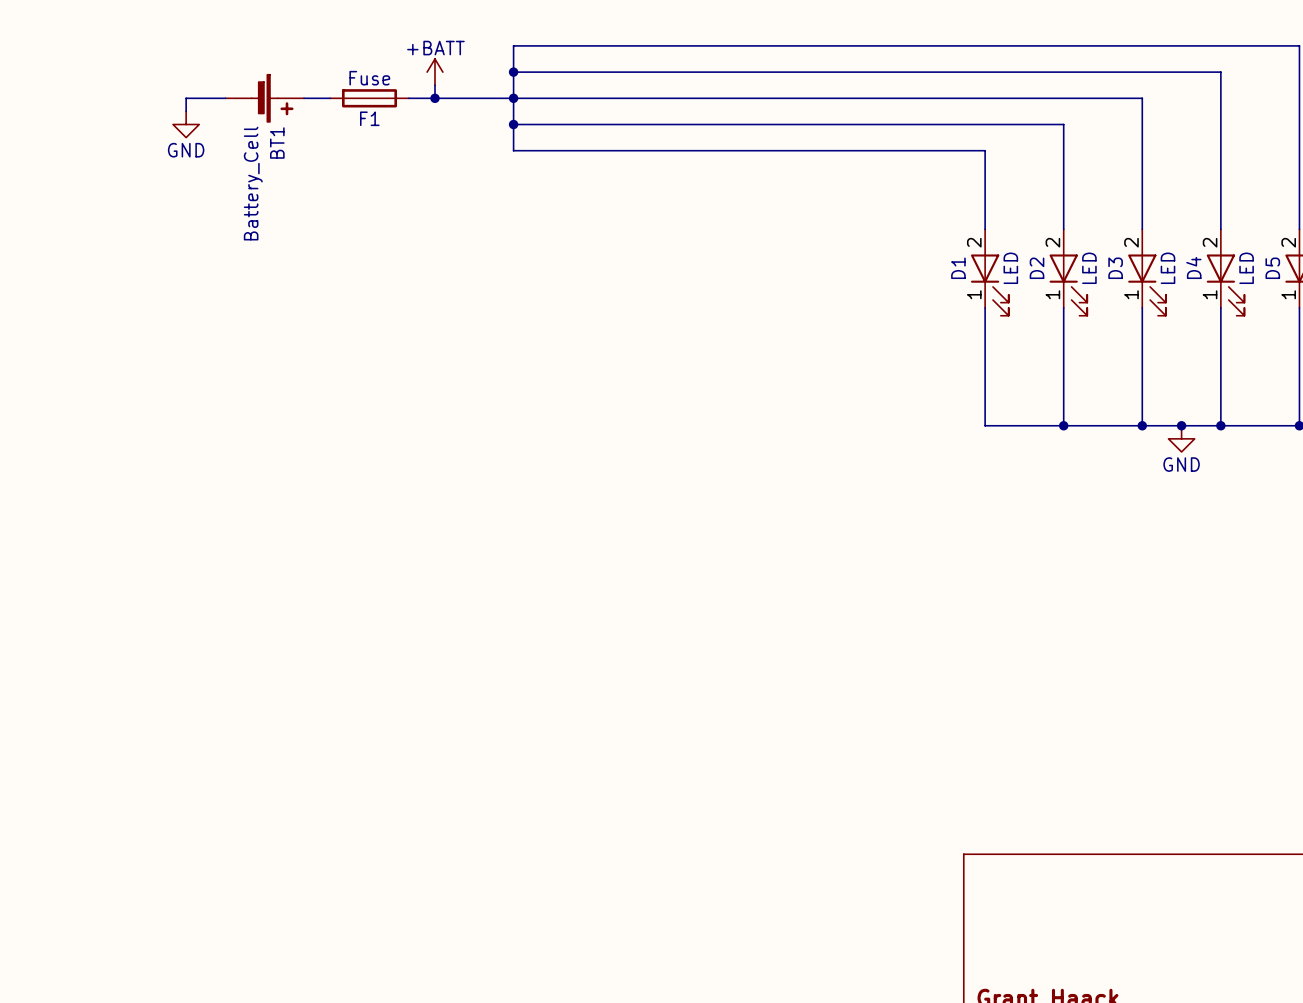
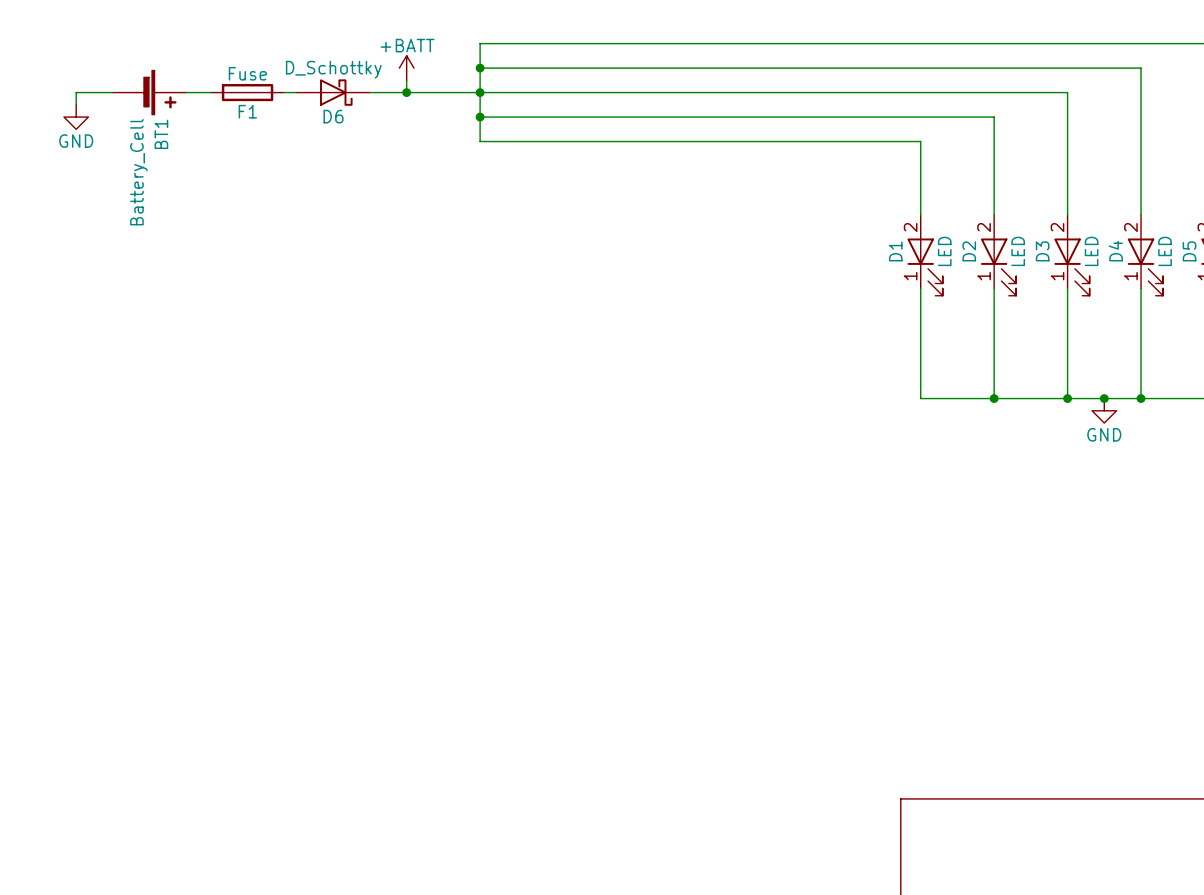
wire: none -> (112, 92) (76, 92) (76, 104)
BT1 position: (264, 98) -> (149, 92)
D6: none -> D_Schottky (333, 92)
F1 position: (369, 98) -> (247, 92)
power symbol position: GND (186, 124) -> GND (76, 117)

